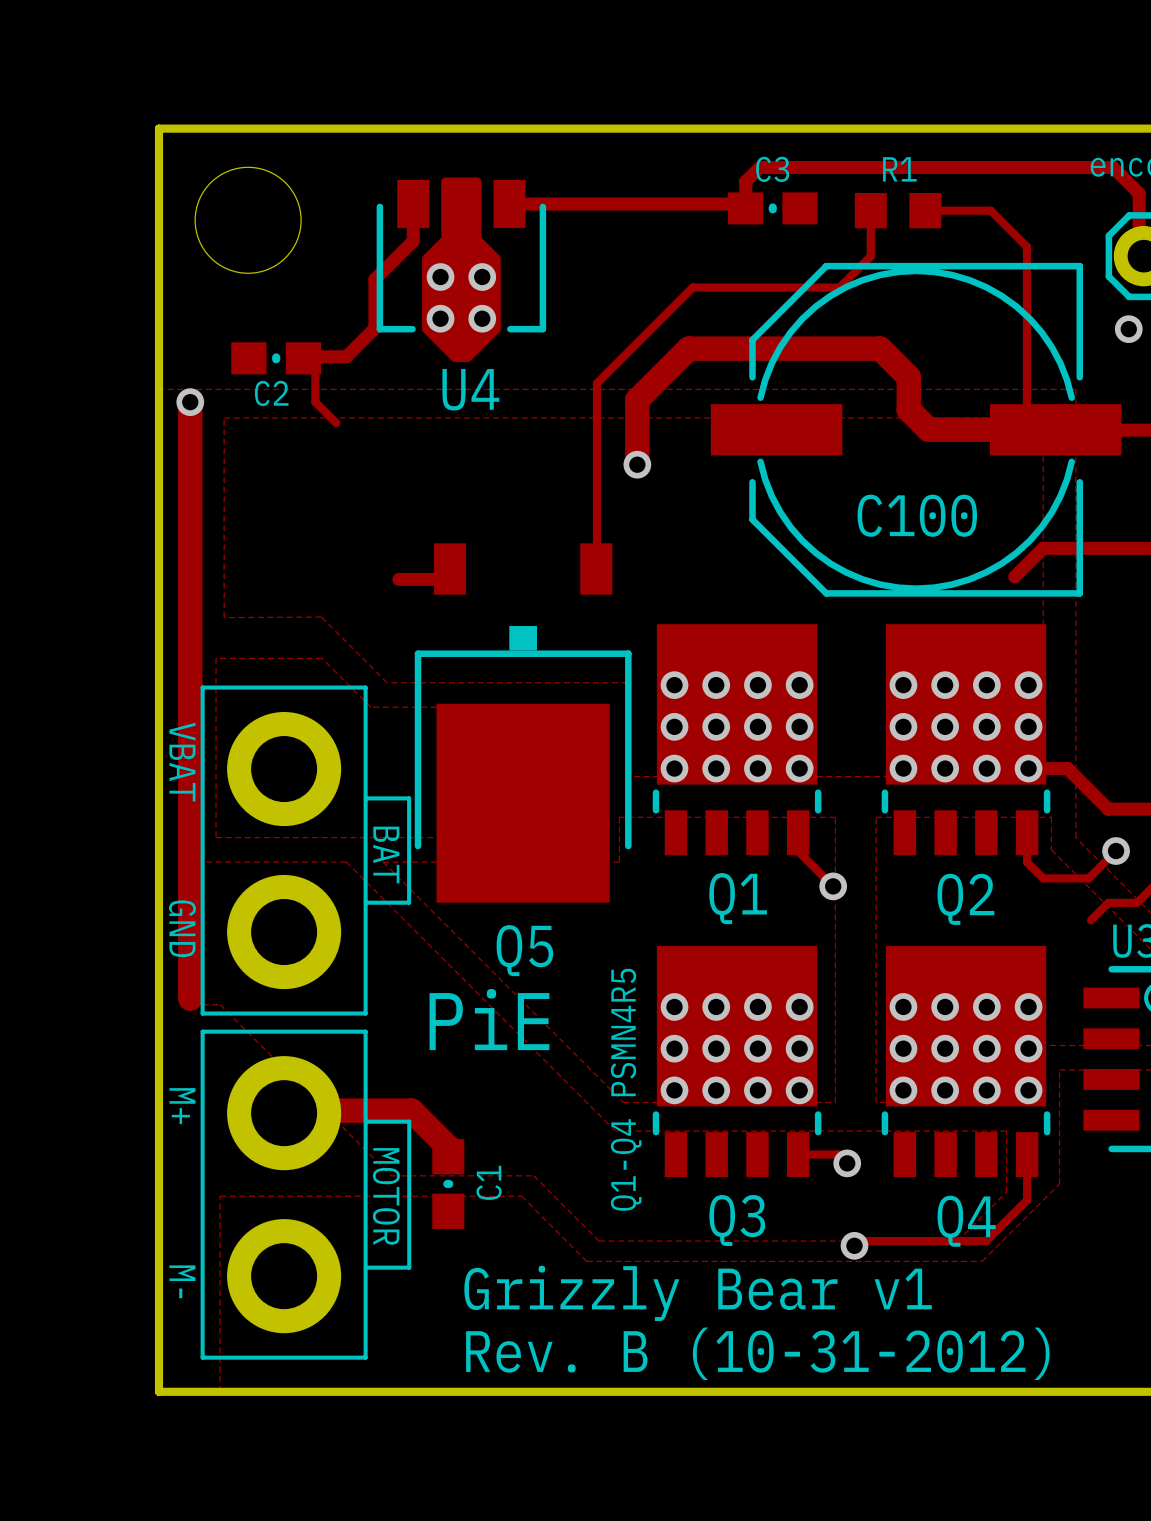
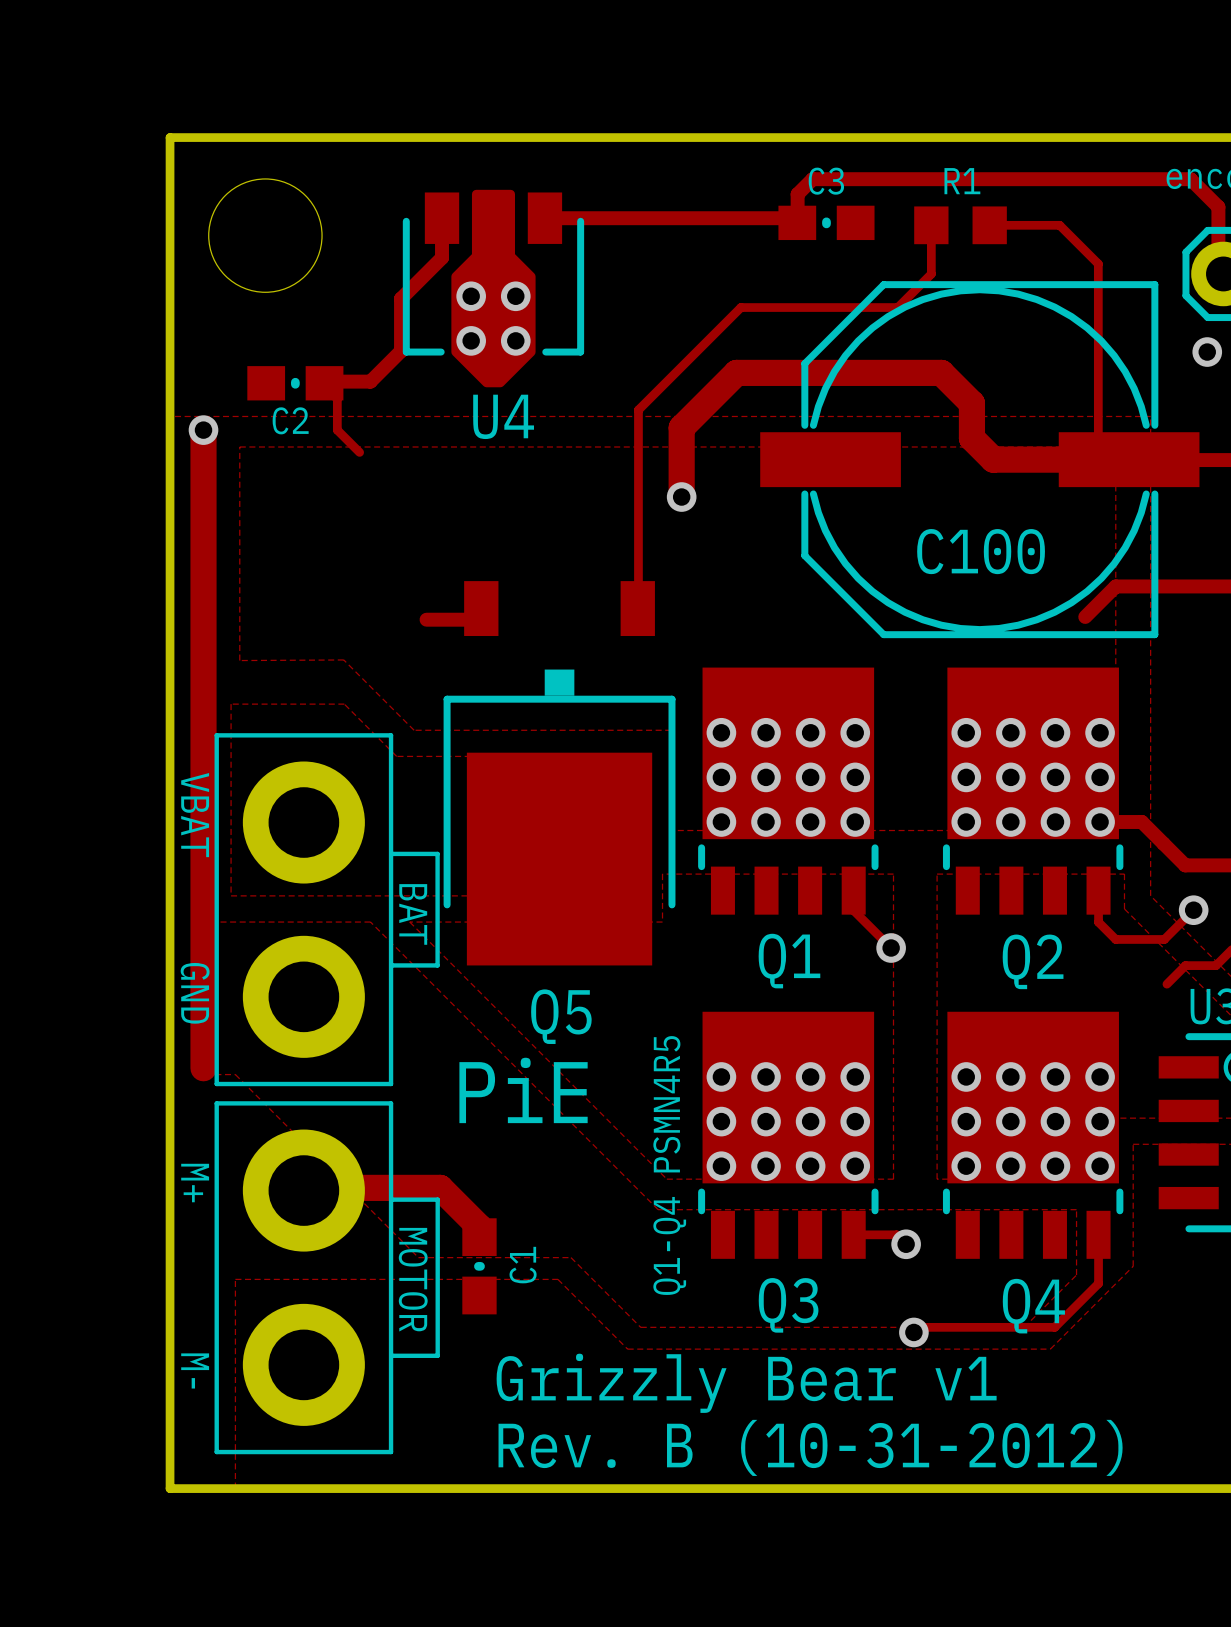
C100 footprint: [710, 262, 1122, 597] -> [760, 281, 1200, 639]

